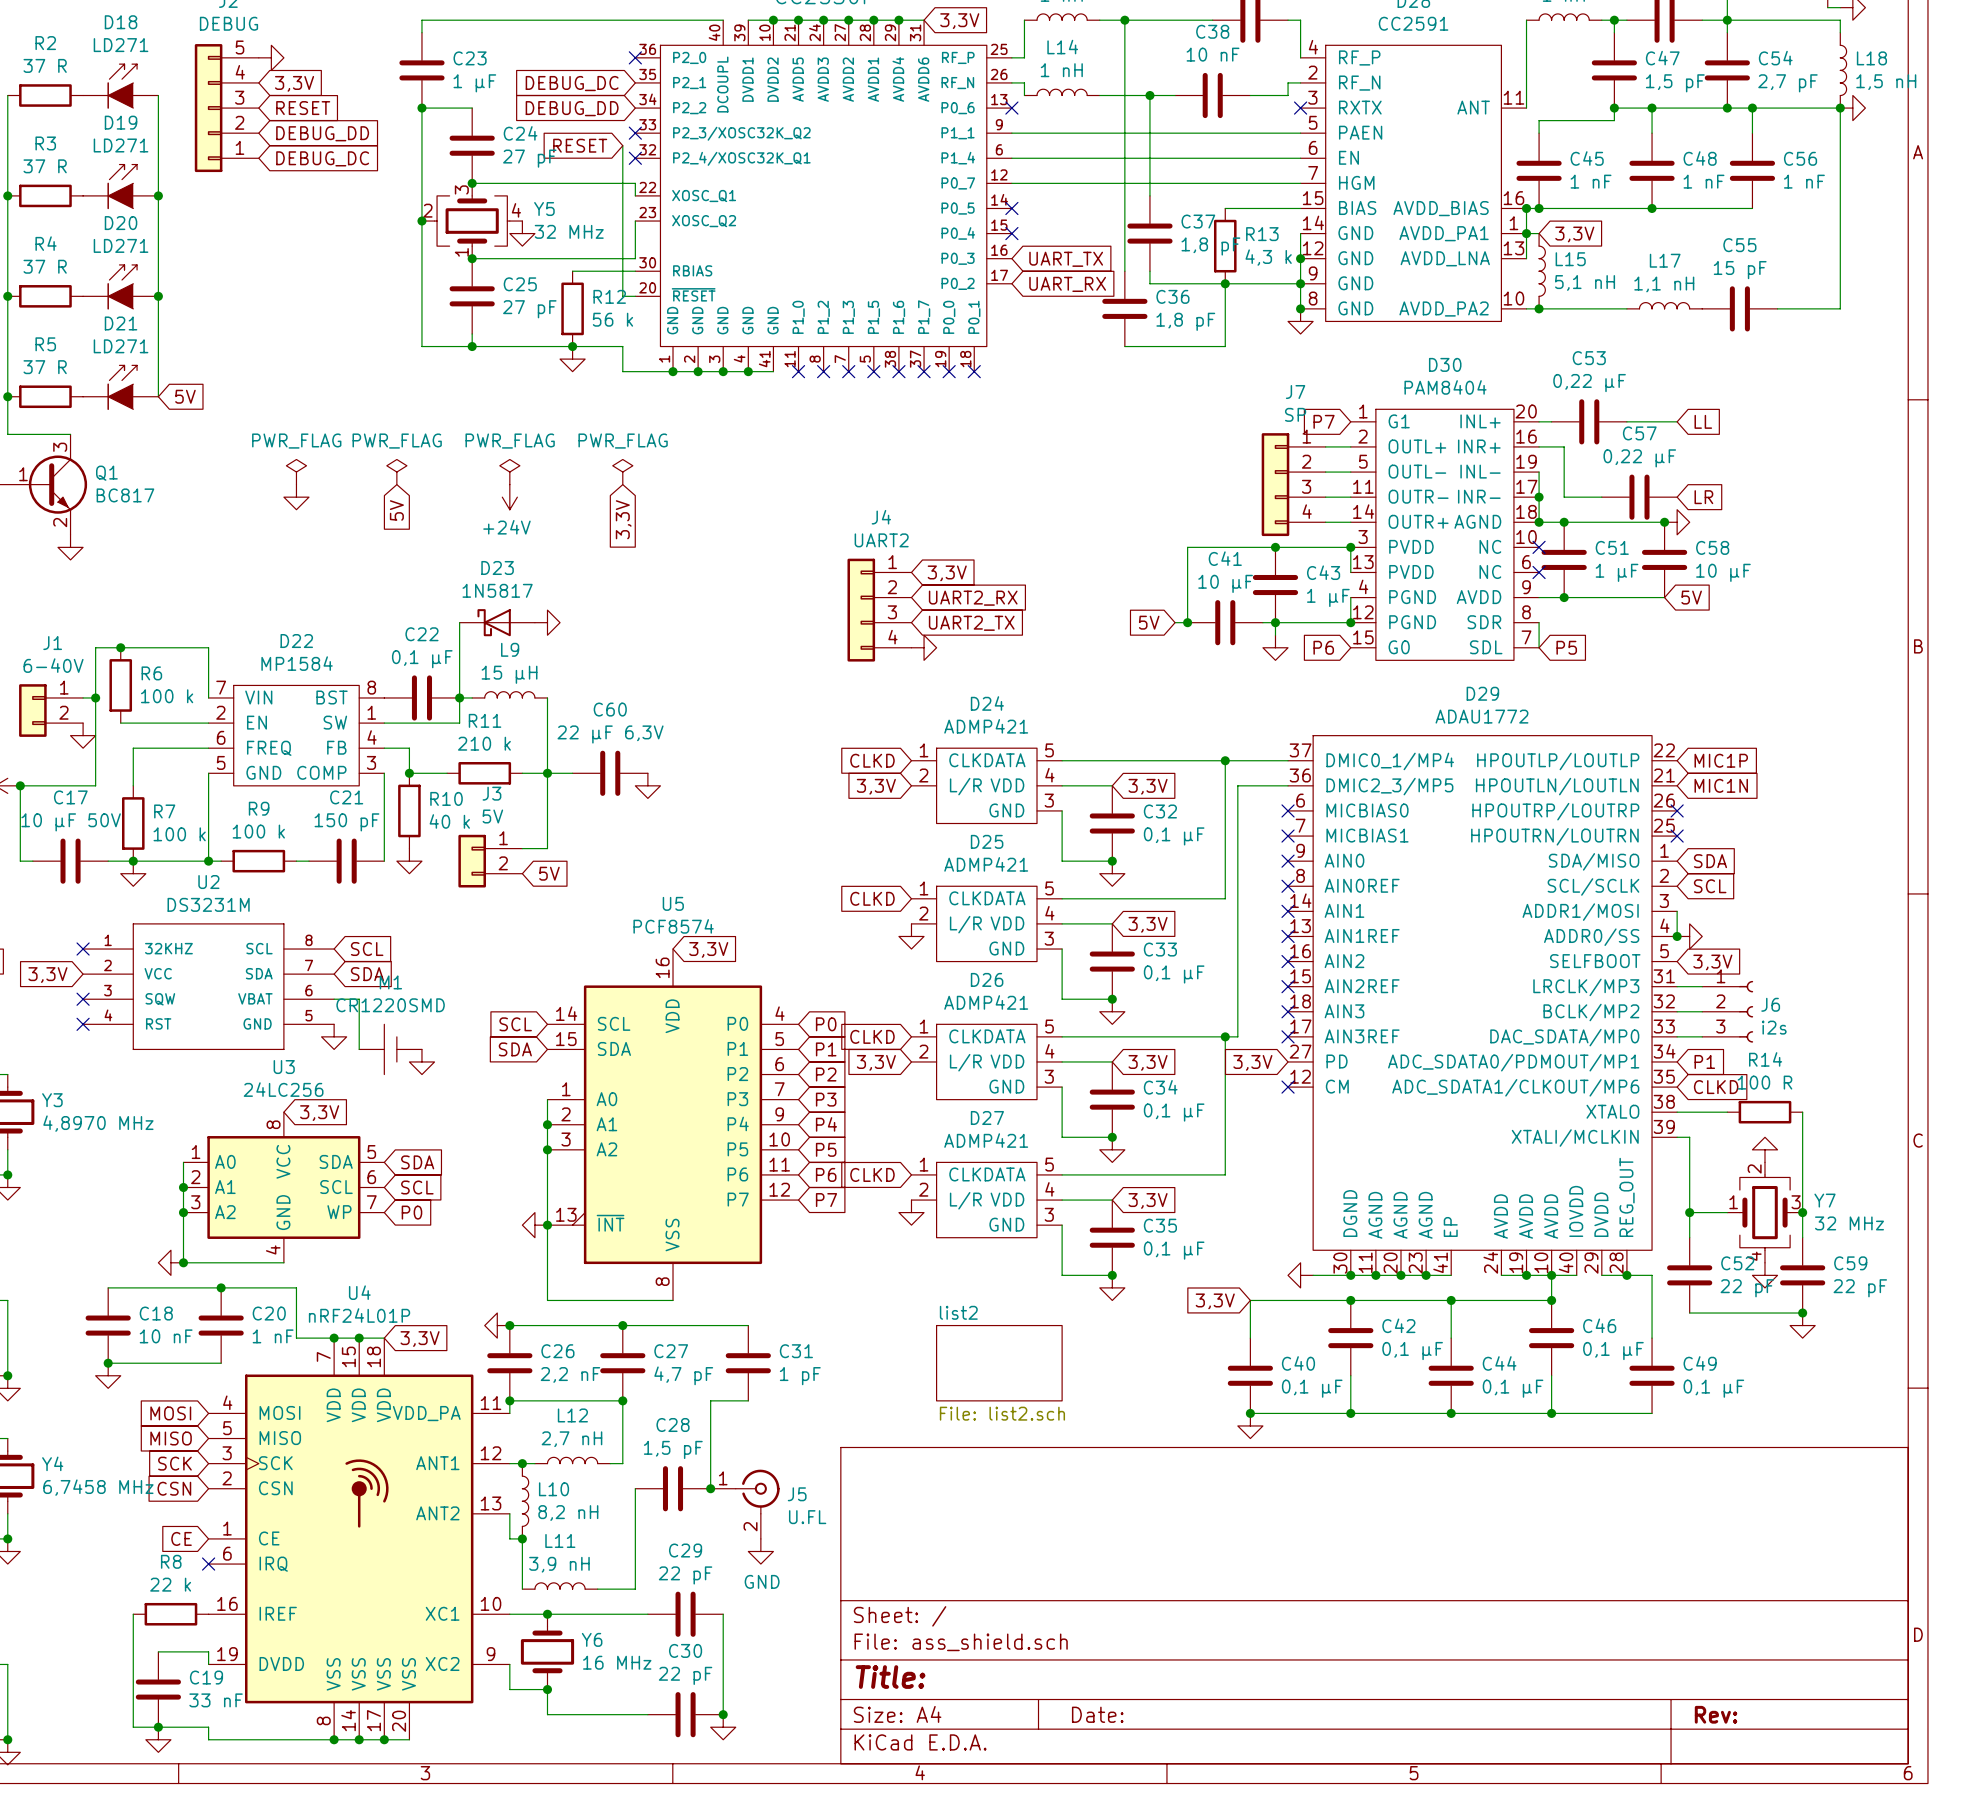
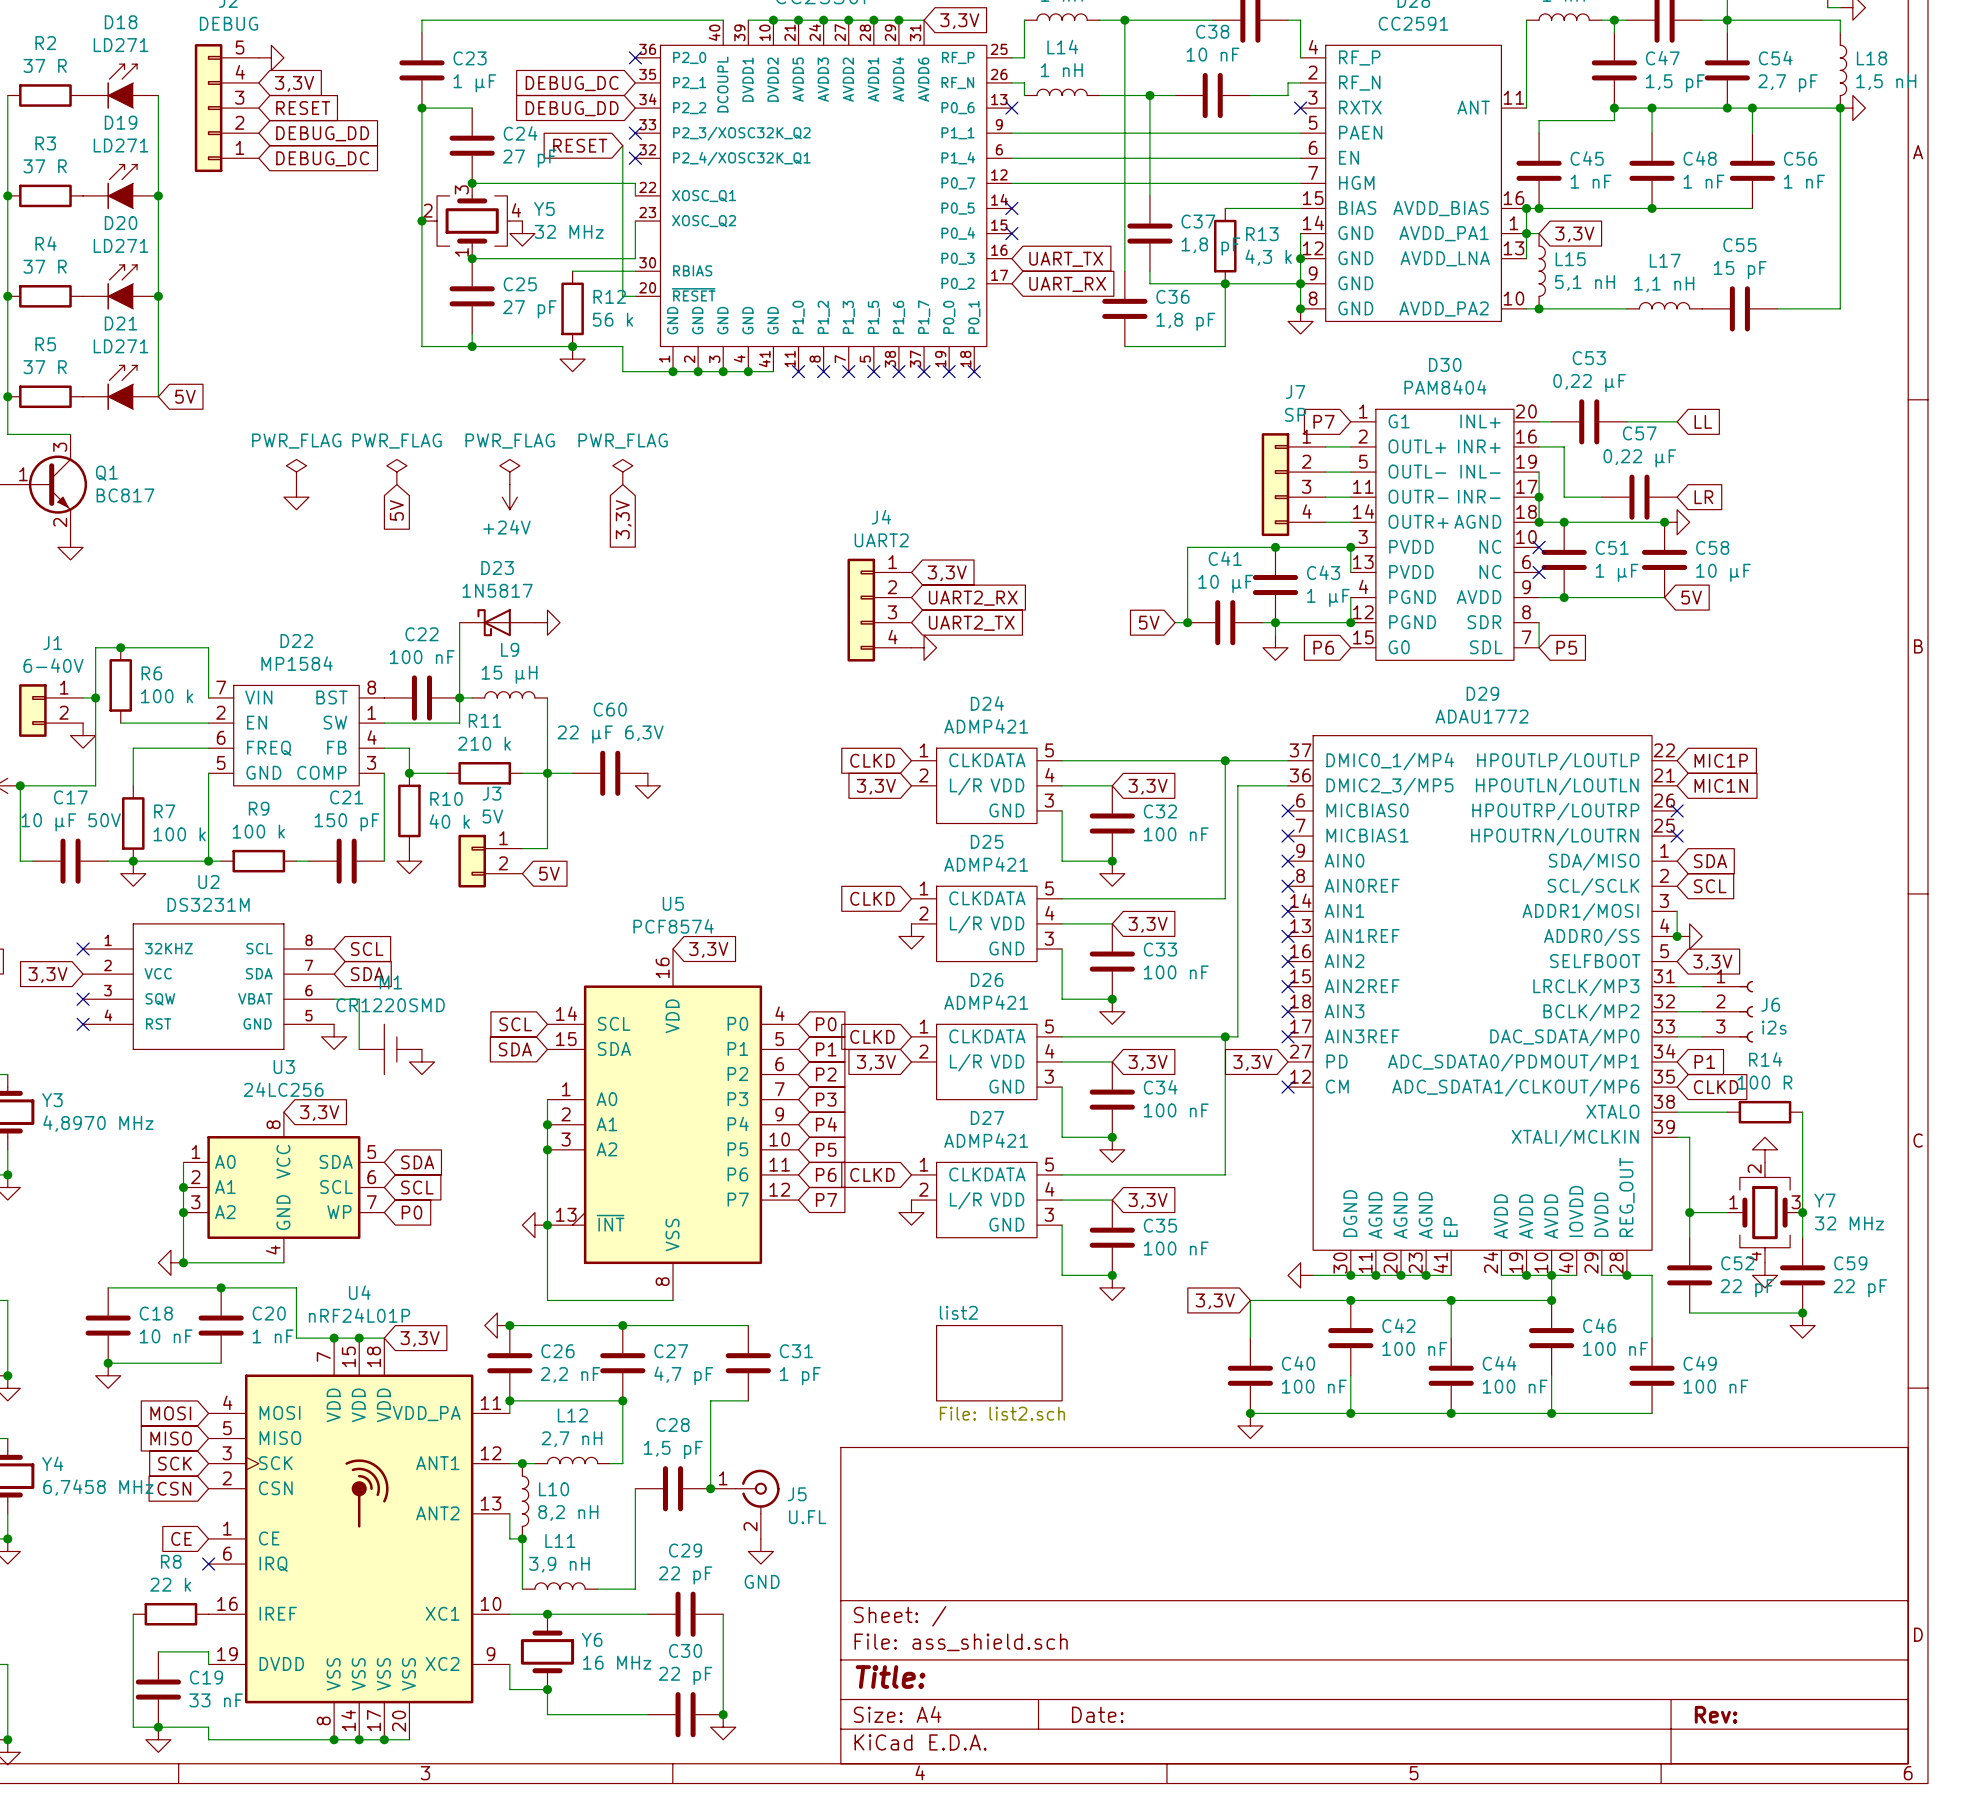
C22 value: 0,1 µF (422, 659) -> 100 nF (422, 657)
C32 value: 0,1 µF (1174, 836) -> 100 nF (1176, 834)
C33 value: 0,1 µF (1174, 974) -> 100 nF (1176, 972)
C34 value: 0,1 µF (1174, 1112) -> 100 nF (1176, 1110)
C35 value: 0,1 µF (1174, 1250) -> 100 nF (1176, 1248)
C42 value: 0,1 µF (1412, 1351) -> 100 nF (1414, 1348)
C46 value: 0,1 µF (1613, 1351) -> 100 nF (1615, 1348)
C40 value: 0,1 µF (1312, 1388) -> 100 nF (1314, 1386)
C44 value: 0,1 µF (1513, 1388) -> 100 nF (1515, 1386)
C49 value: 0,1 µF (1713, 1388) -> 100 nF (1715, 1386)

